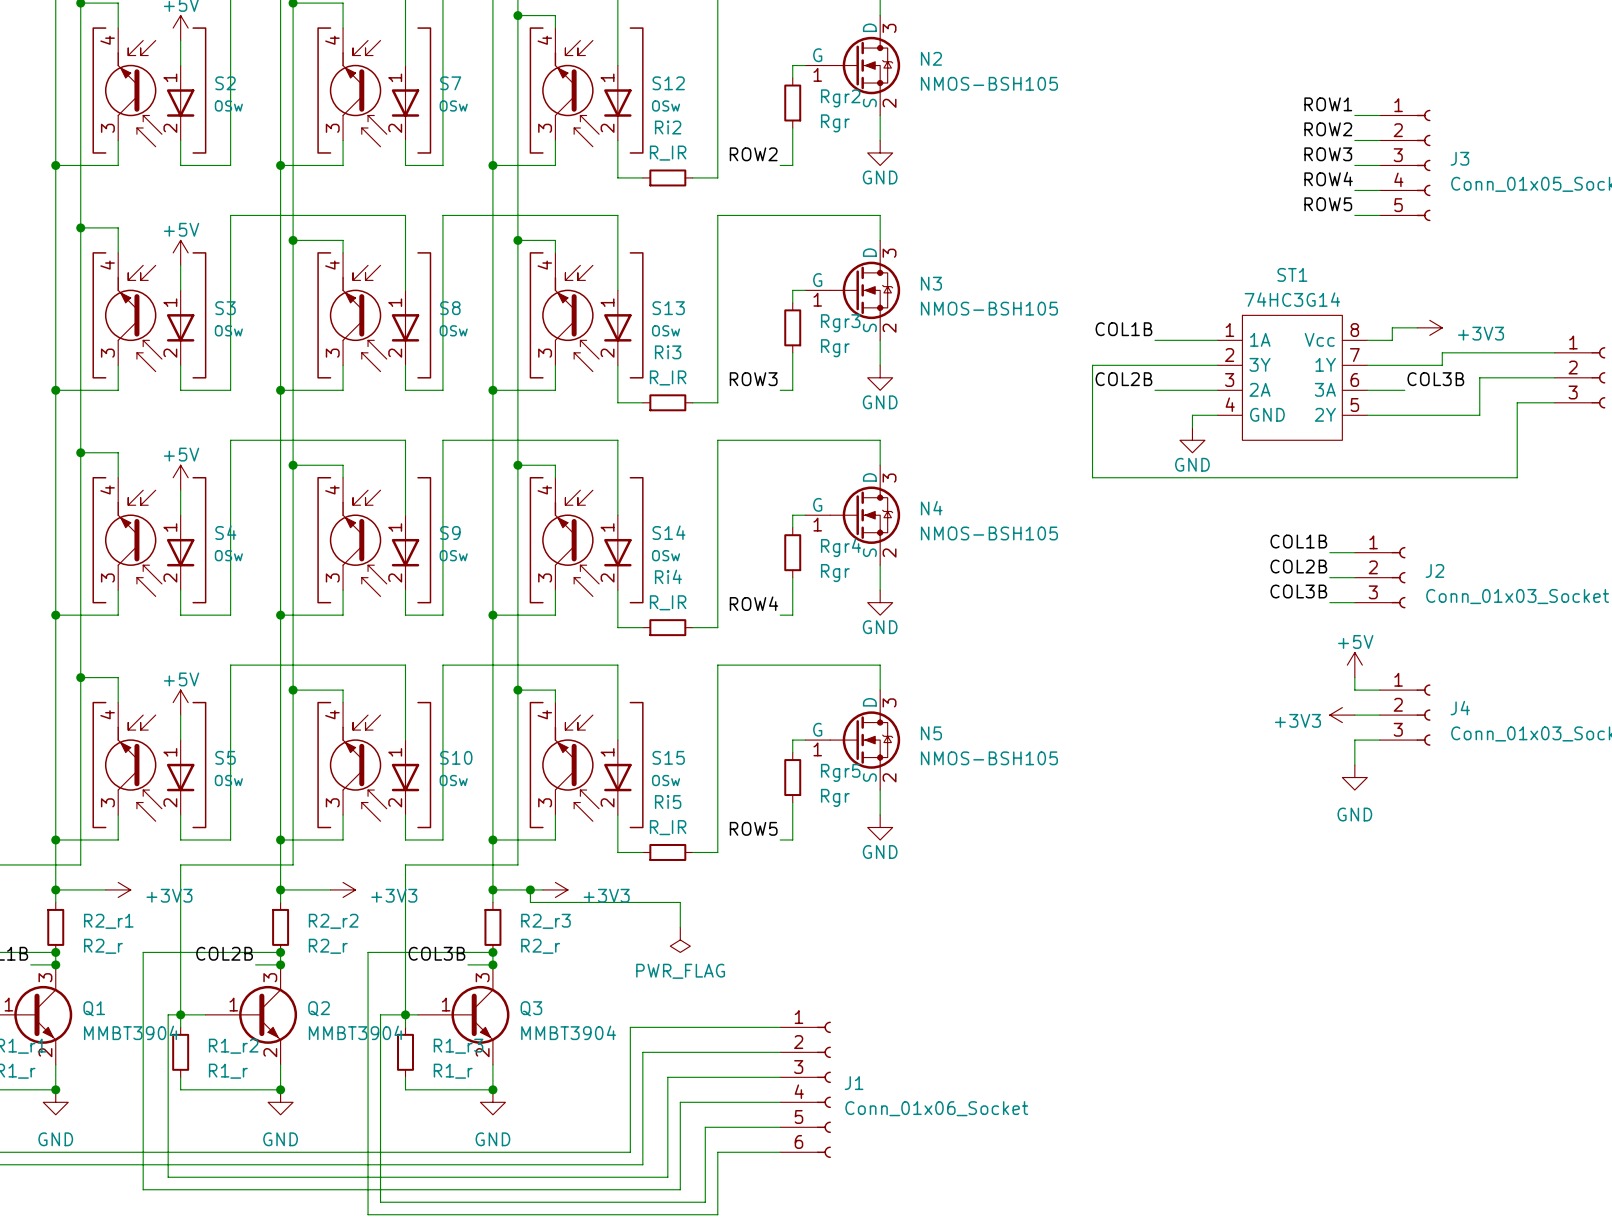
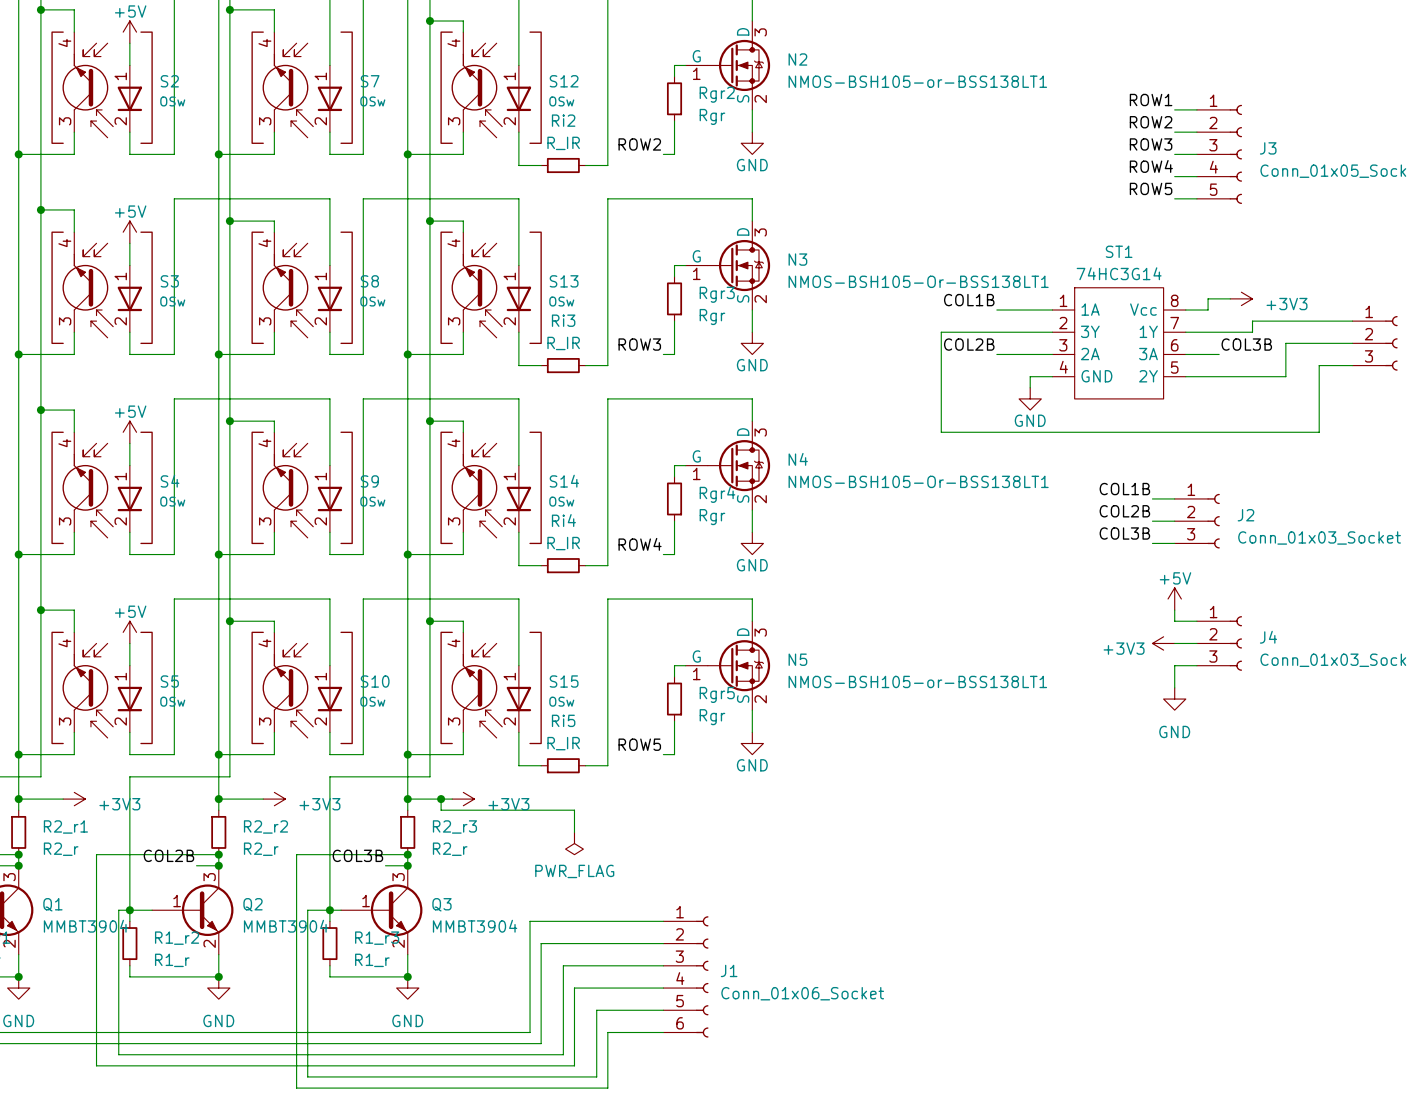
N2 value: NMOS-BSH105 (989, 83) -> NMOS-BSH105-or-BSS138LT1 (917, 81)
N3 value: NMOS-BSH105 (989, 308) -> NMOS-BSH105-Or-BSS138LT1 (918, 281)
N4 value: NMOS-BSH105 (989, 533) -> NMOS-BSH105-Or-BSS138LT1 (918, 481)
N5 value: NMOS-BSH105 (989, 758) -> NMOS-BSH105-or-BSS138LT1 (917, 681)

